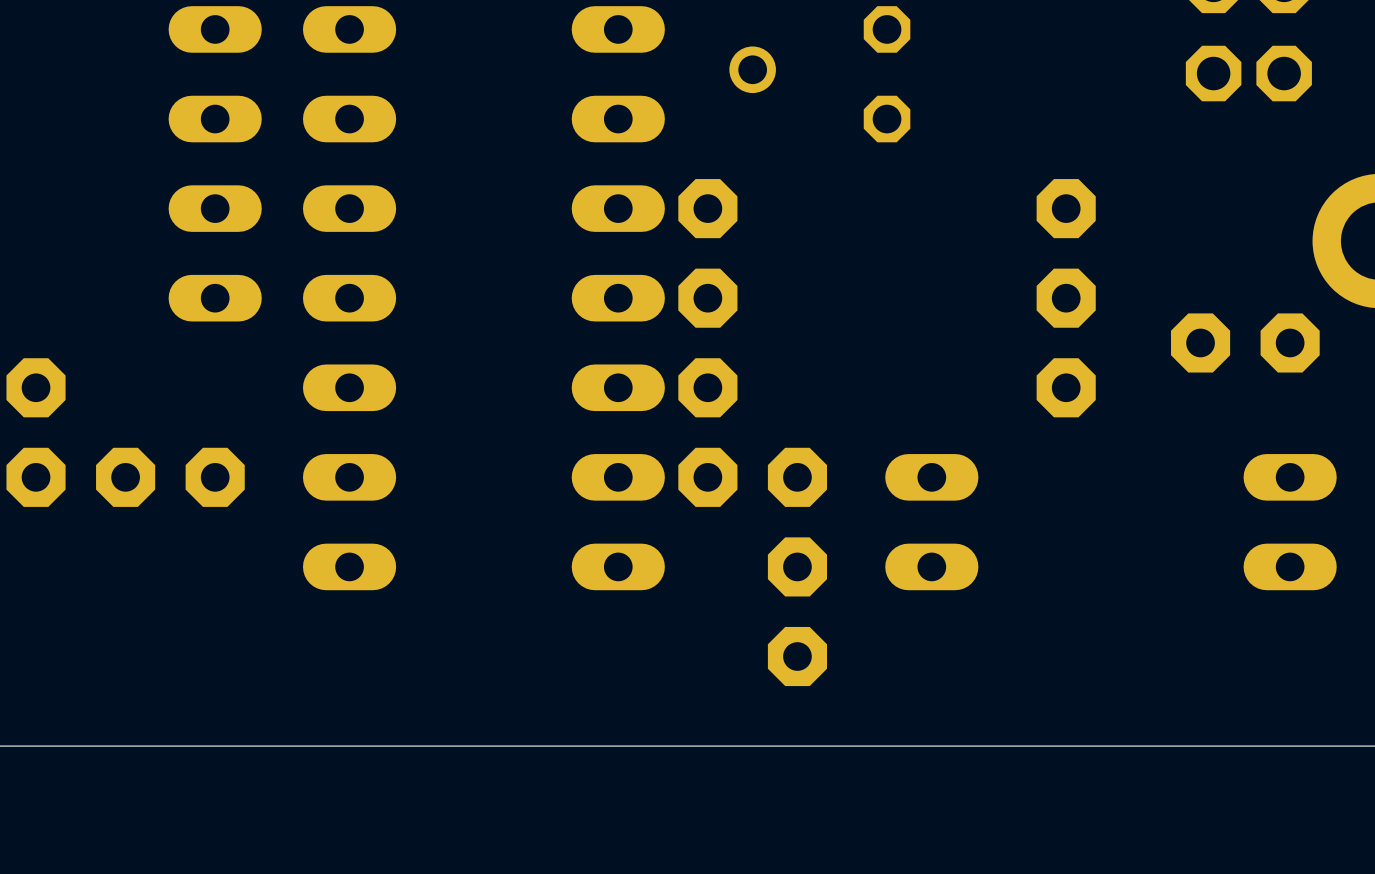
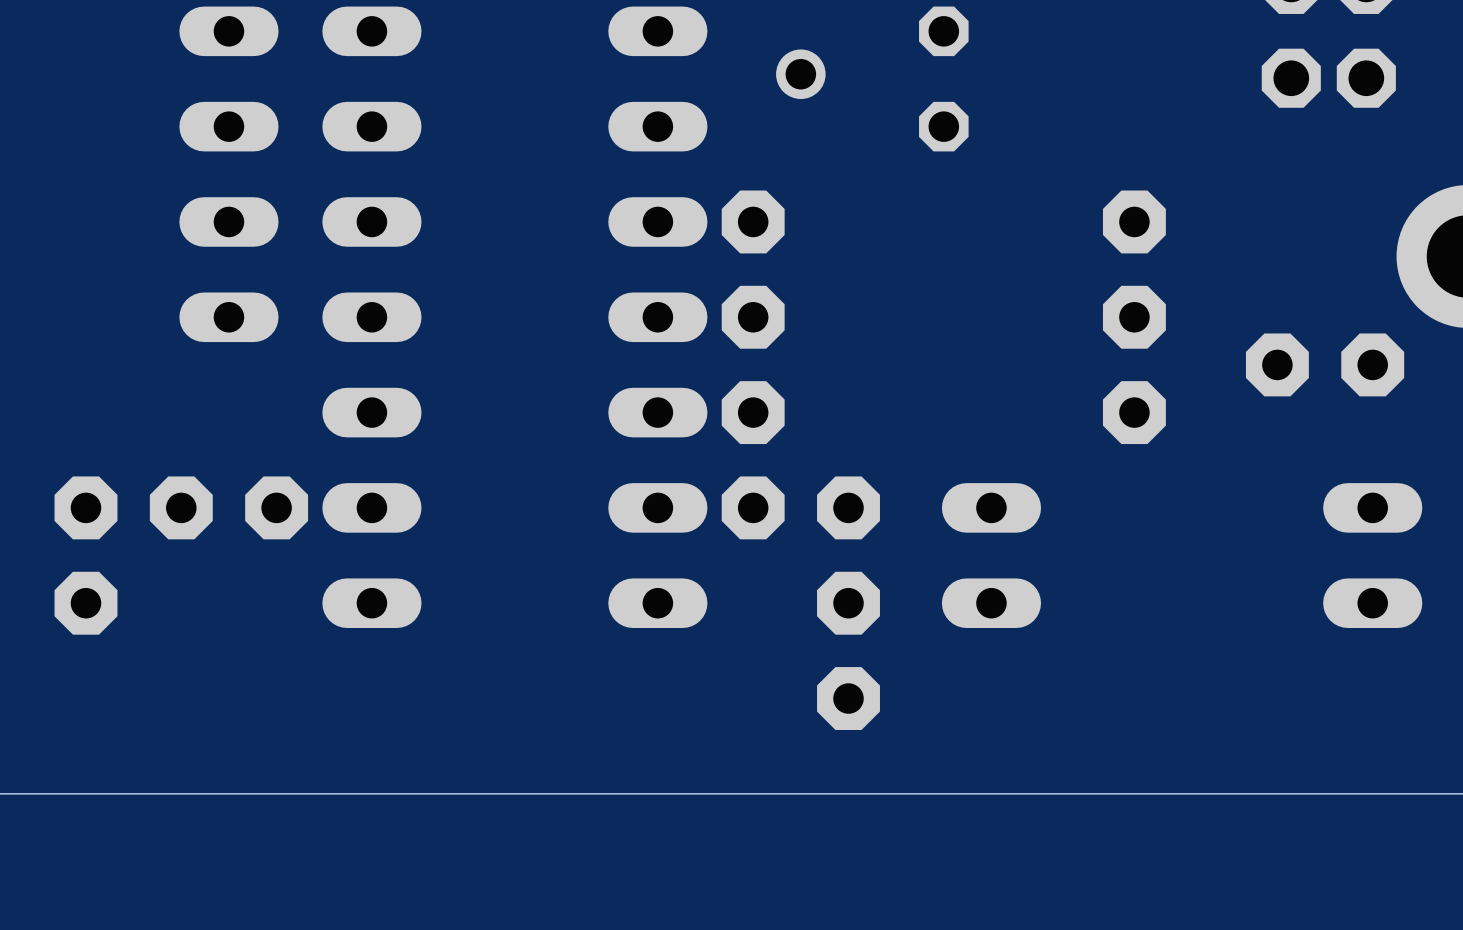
part: (36, 432) -> none
part position: (170, 477) -> (228, 507)
part: none -> (85, 555)

